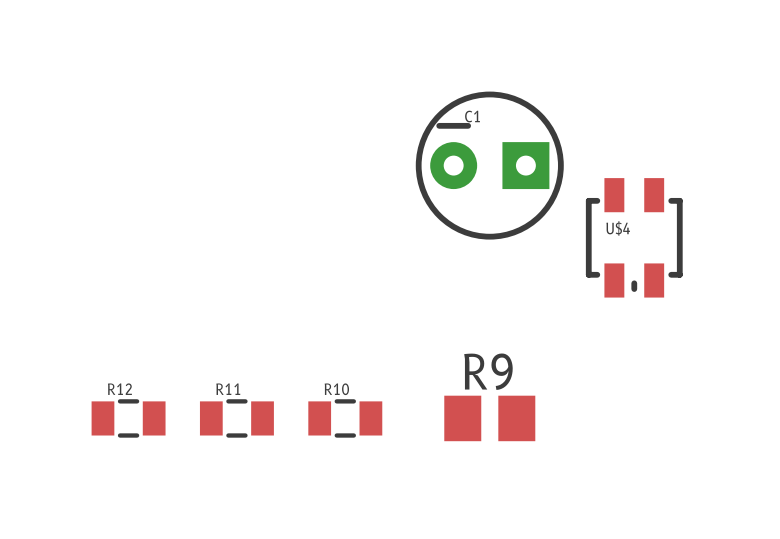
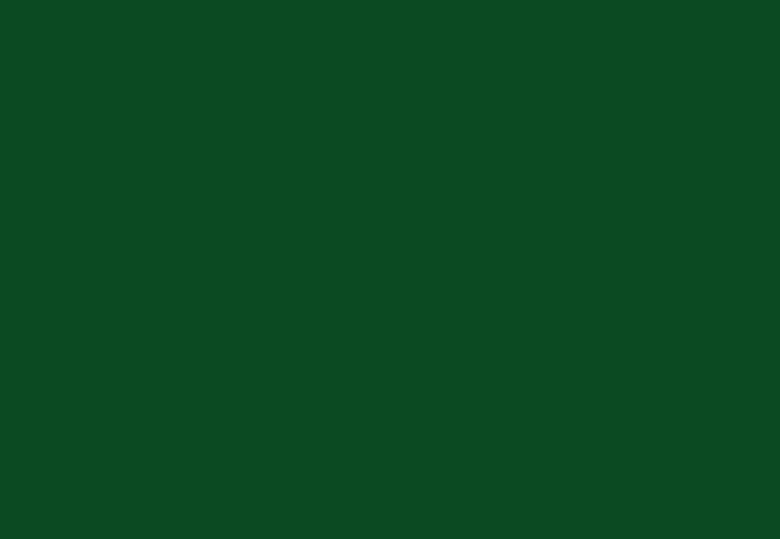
C1: (489, 165) -> none
U$4: (634, 237) -> none
R12: (128, 418) -> none
R11: (236, 418) -> none
R10: (345, 418) -> none
R9: (489, 418) -> none

